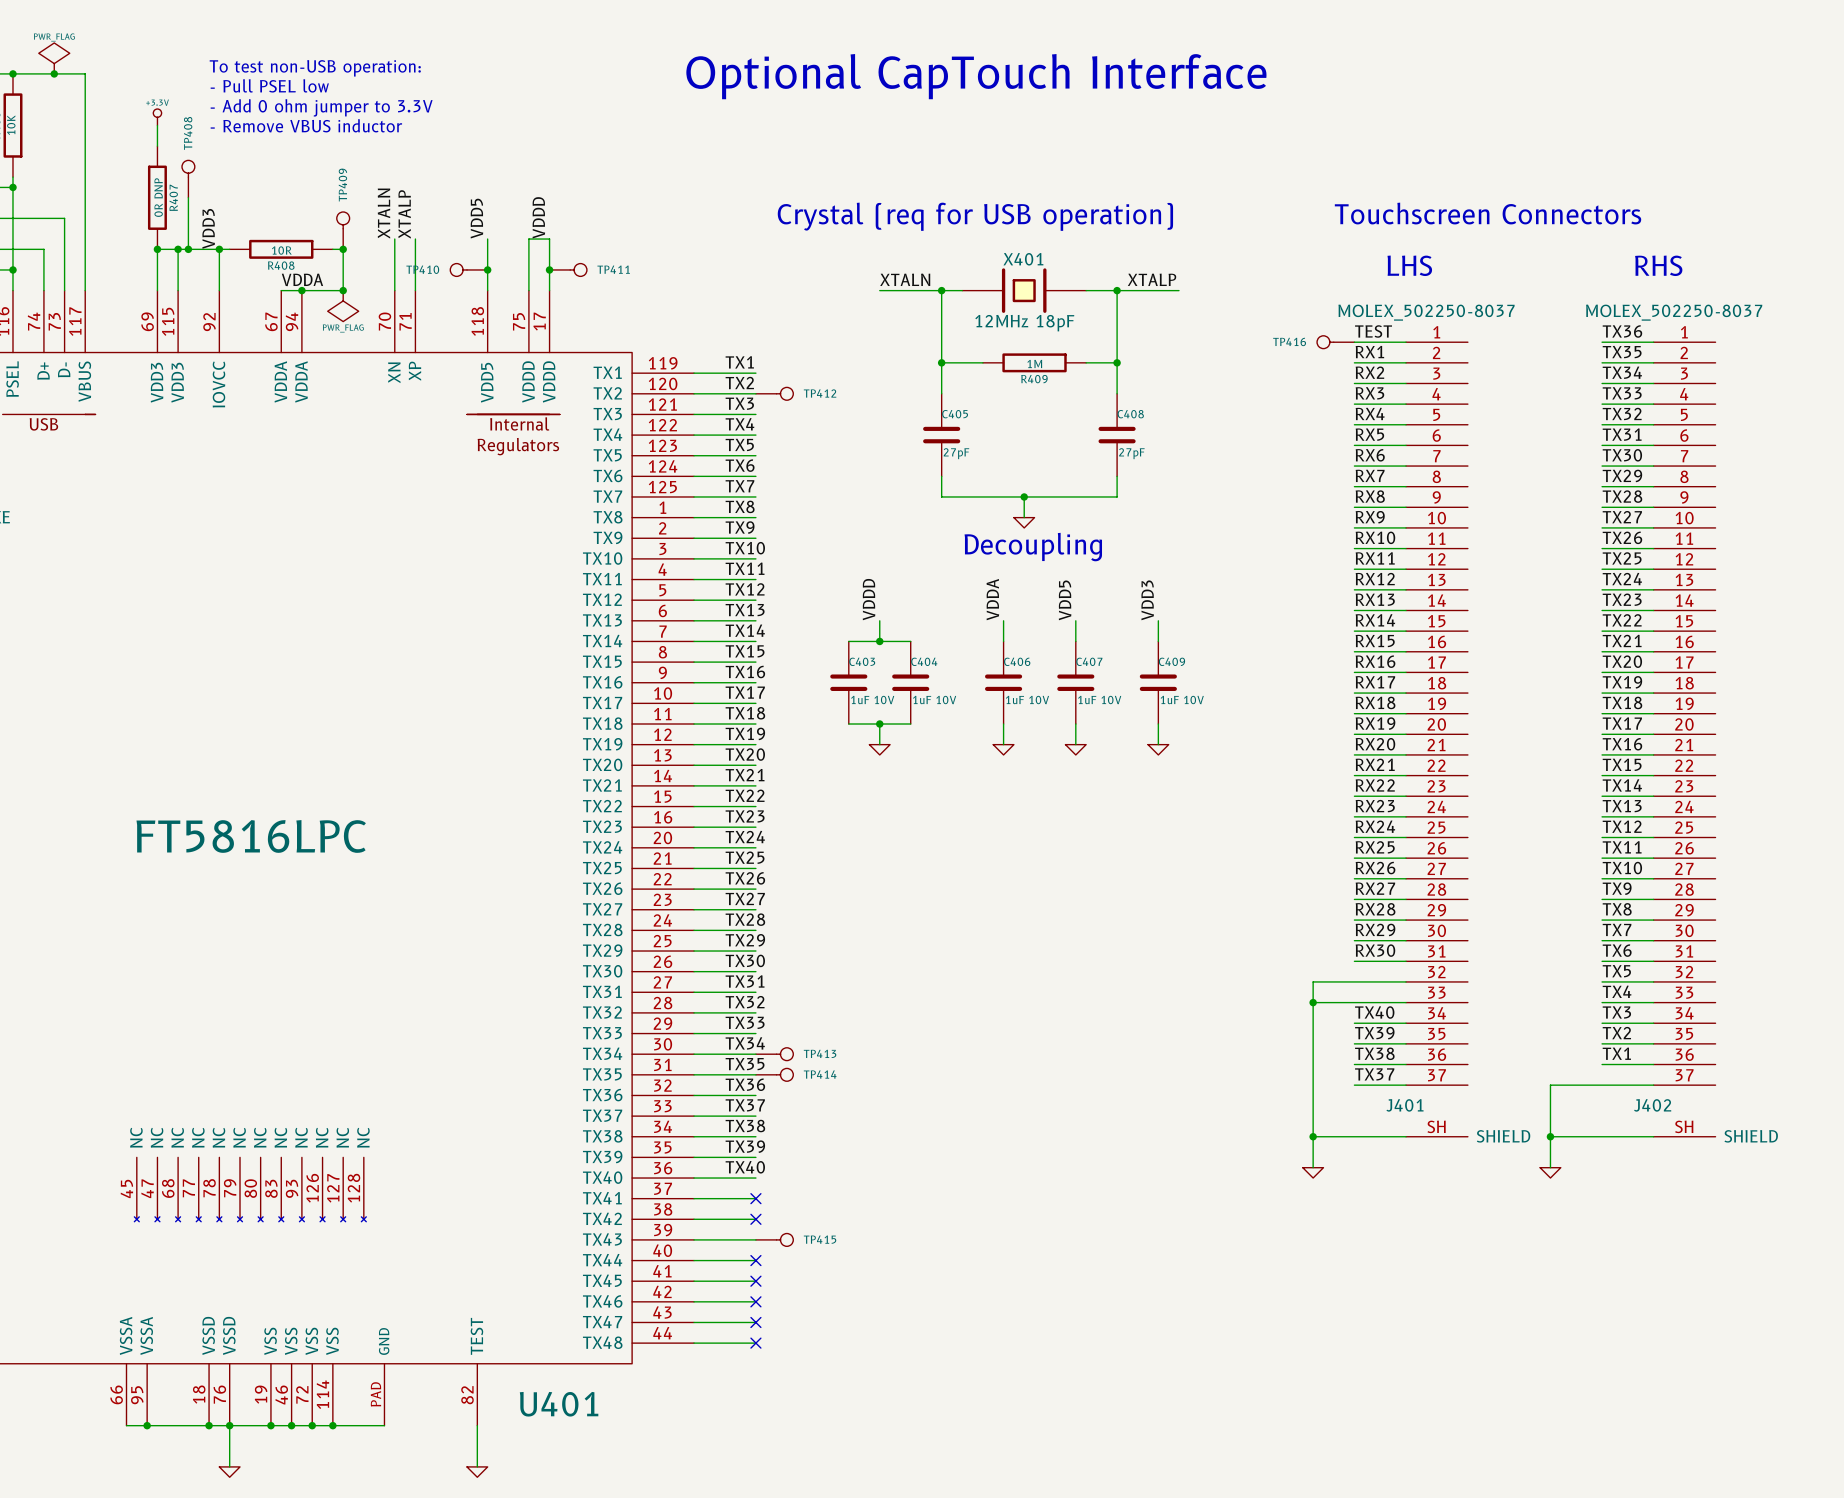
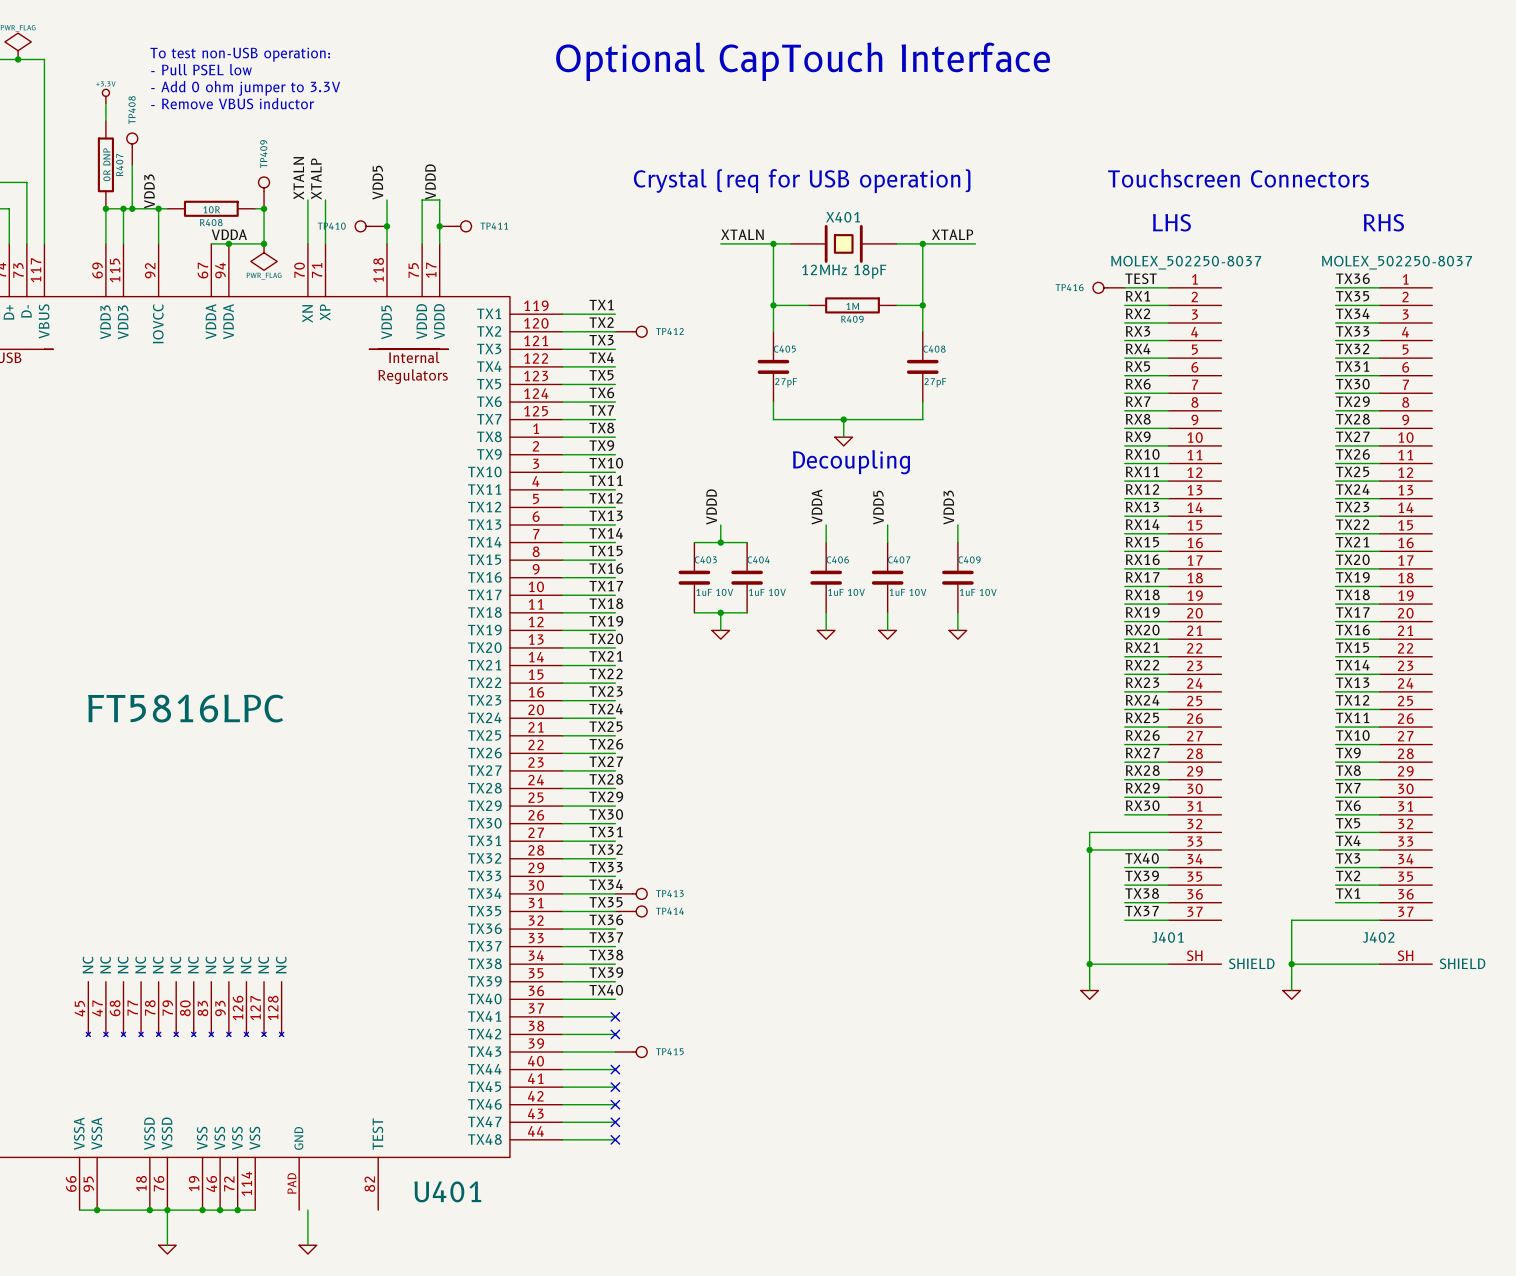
wire: (332, 1425) (384, 1425) -> none
junction: (332, 1425) -> none
wire: (477, 1425) (477, 1466) -> (307, 1210) (307, 1245)
power symbol position: (477, 1472) -> (307, 1249)

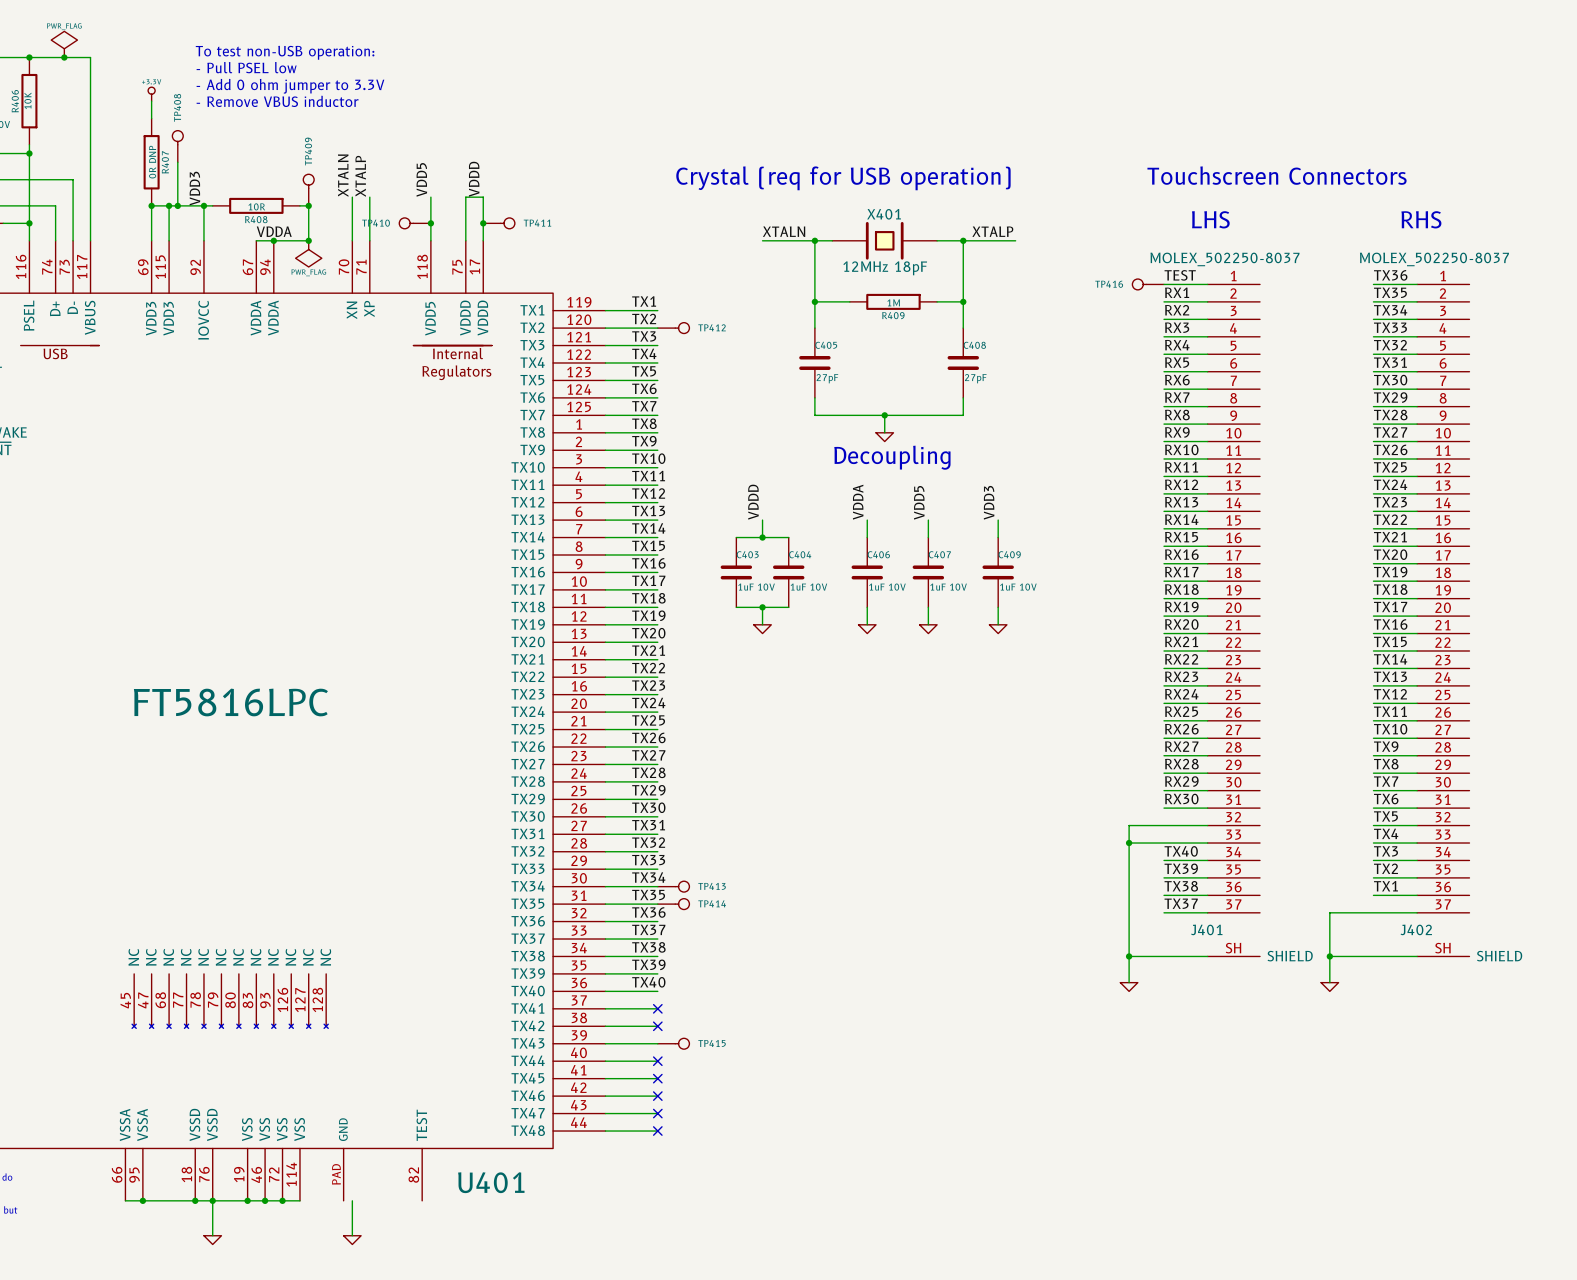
text: Optional CapTouch Interface (803, 61) -> none

